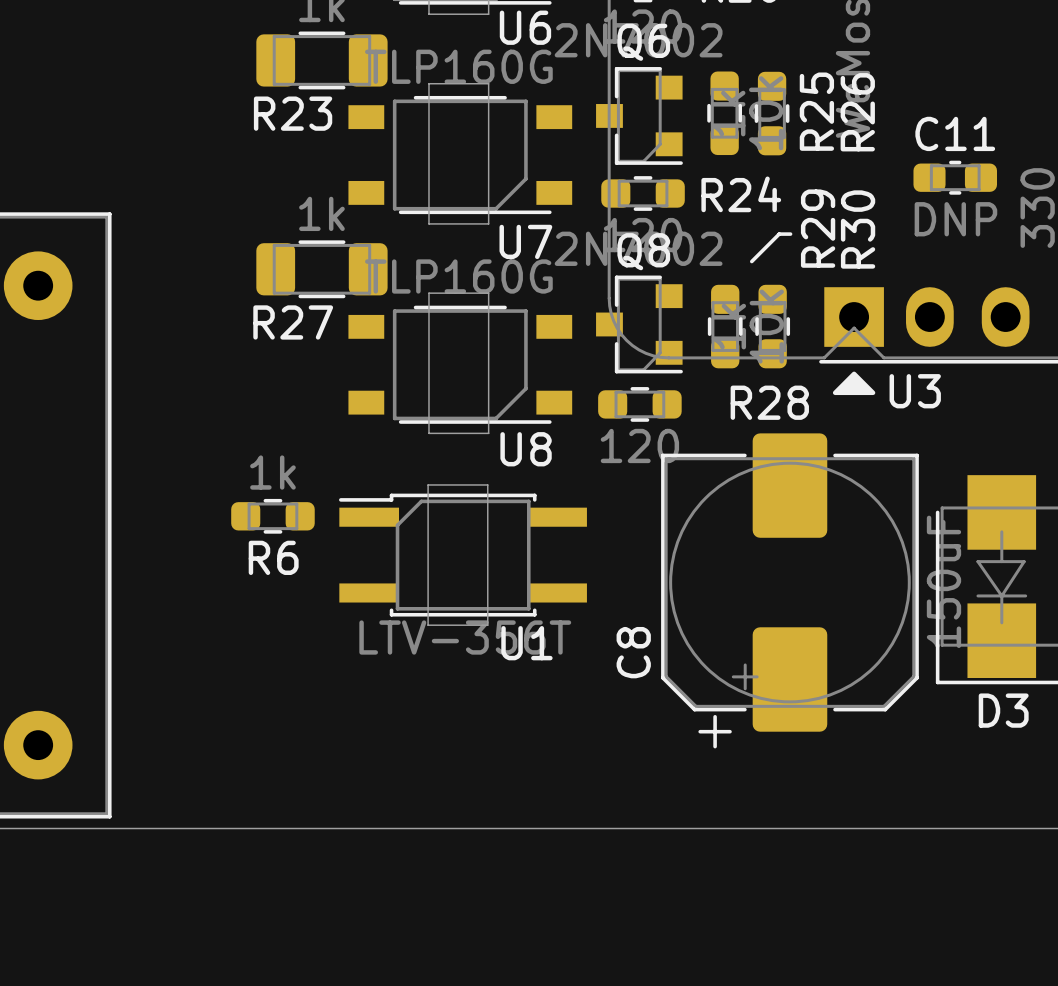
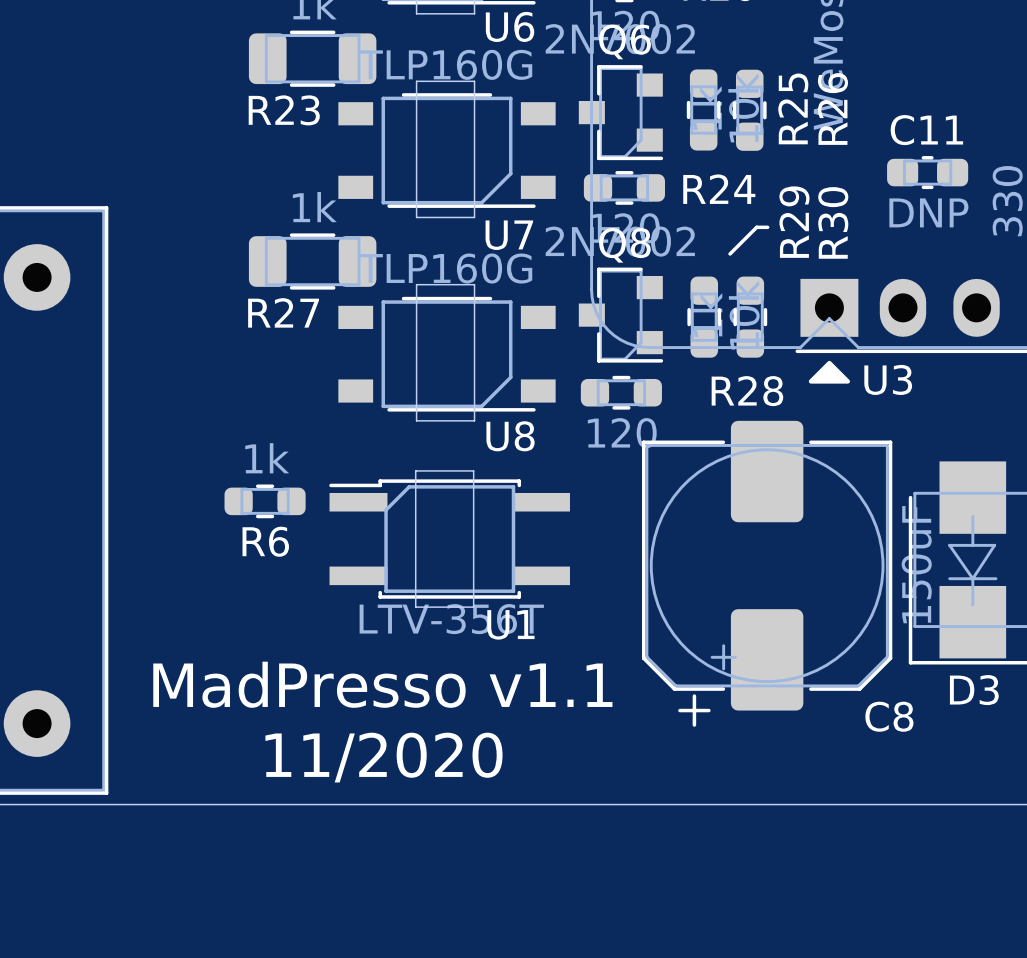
C8 name rotation: 0° (633, 652) -> 90° clockwise (889, 716)
C8 name position: C8 (633, 652) -> C8 (889, 716)
text: none -> MadPresso v1.1 (382, 684)
text: none -> 11/2020 (383, 757)

